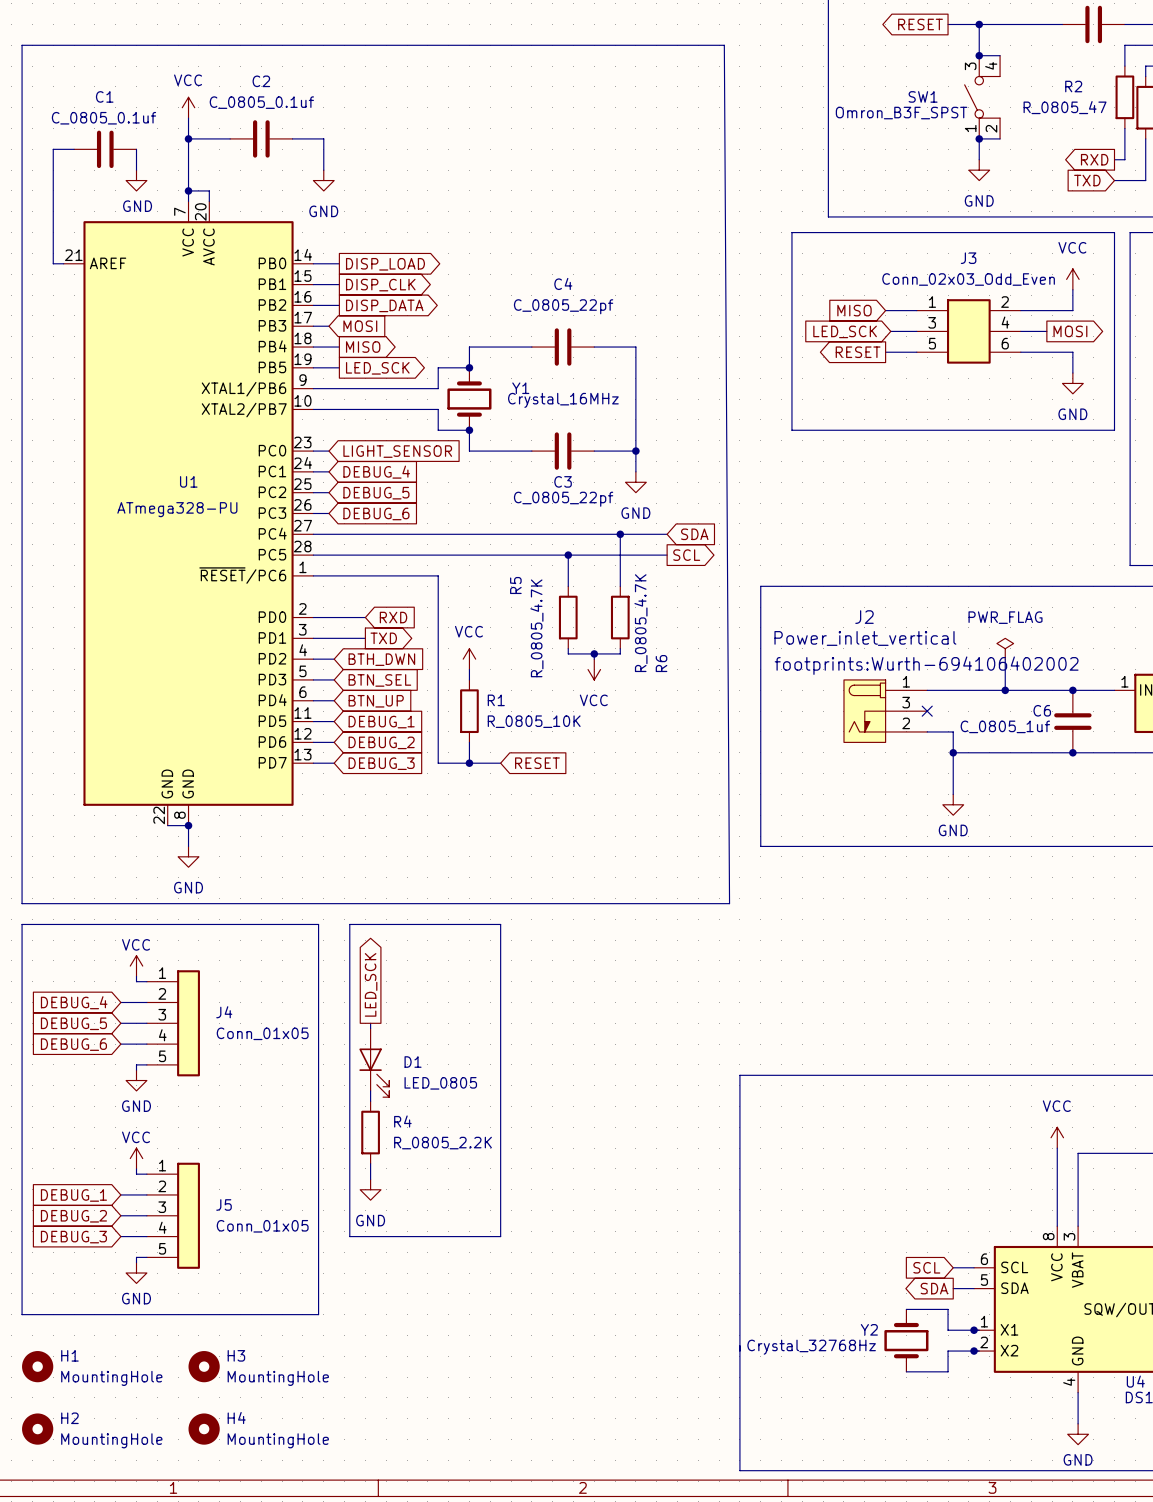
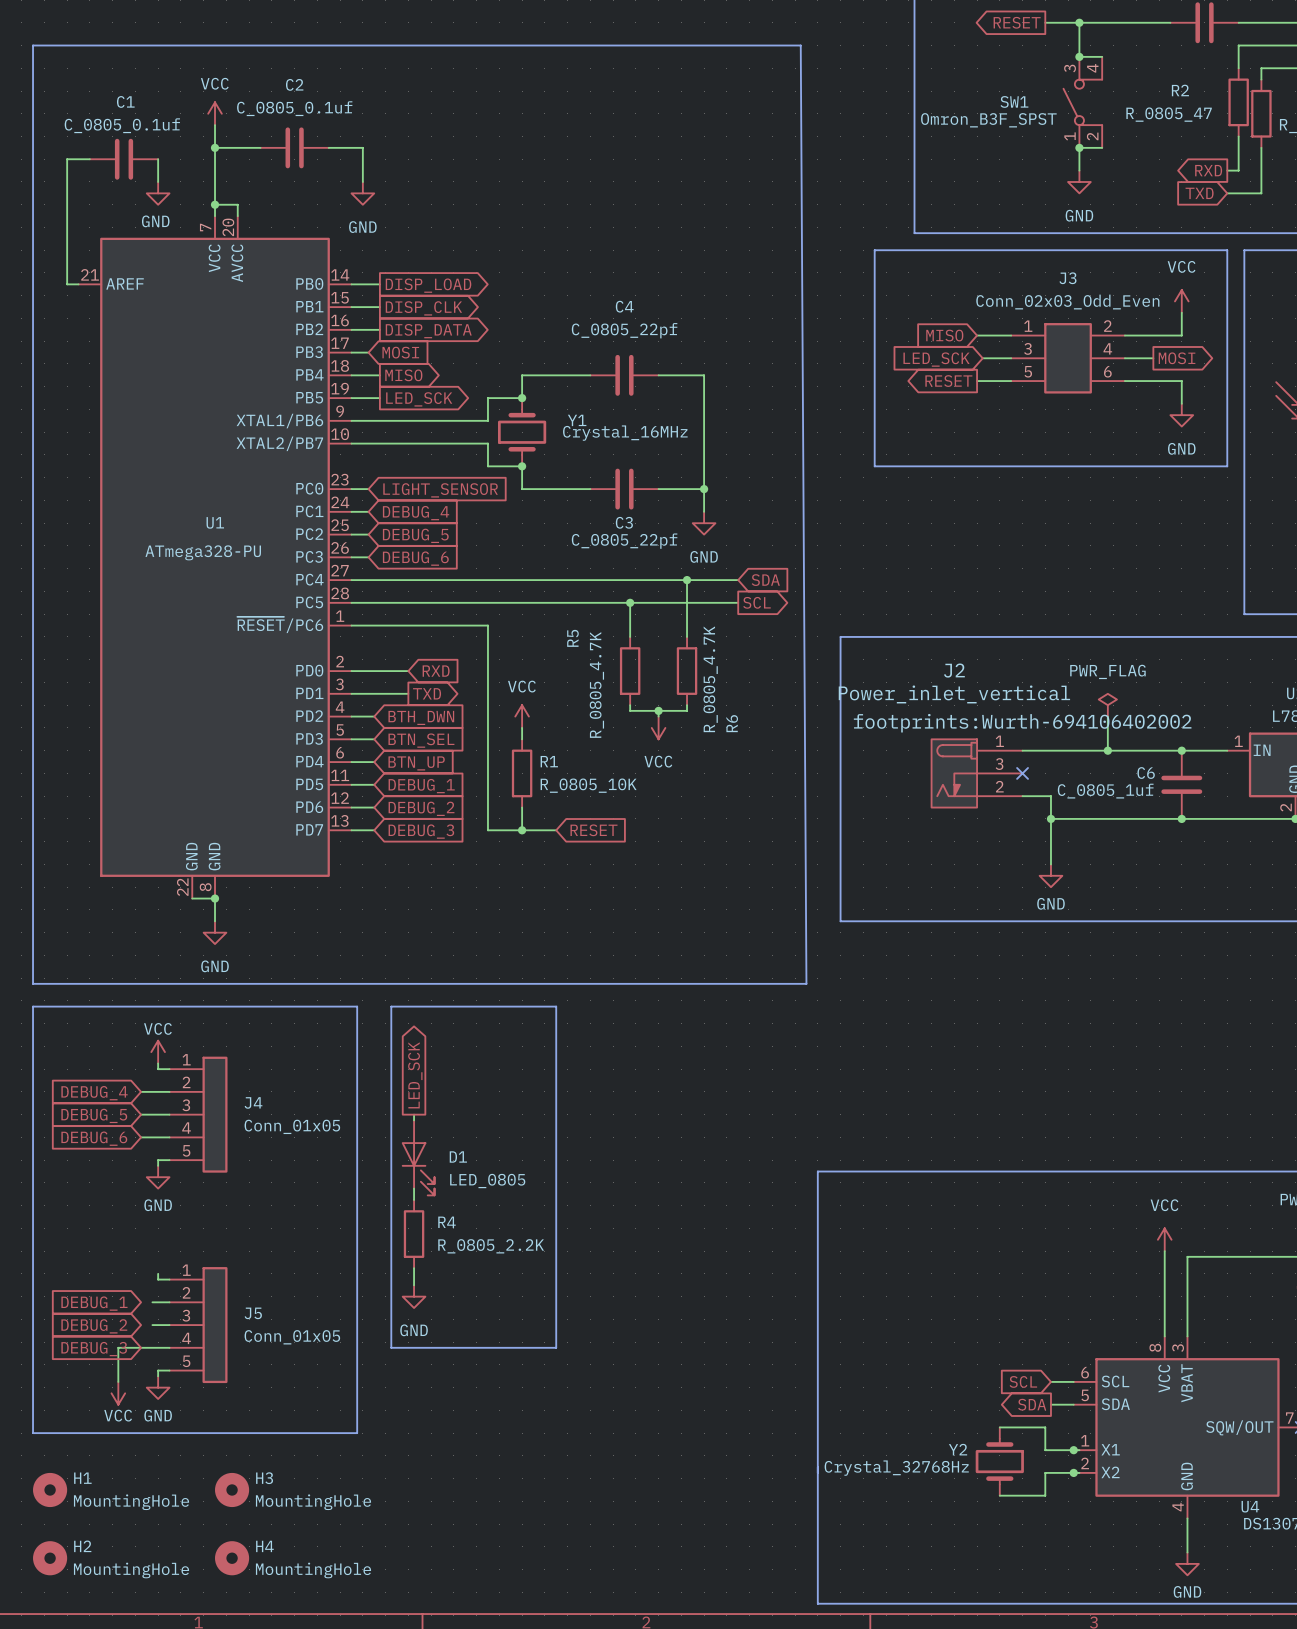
power symbol rotation: 0° (136, 1158) -> 180° (118, 1393)
power symbol position: VCC (136, 1158) -> VCC (118, 1393)
wire: (120, 1194) (131, 1194) -> none
wire: (120, 1215) (131, 1215) -> none
wire: none -> (141, 1347) (118, 1347) (118, 1381)

